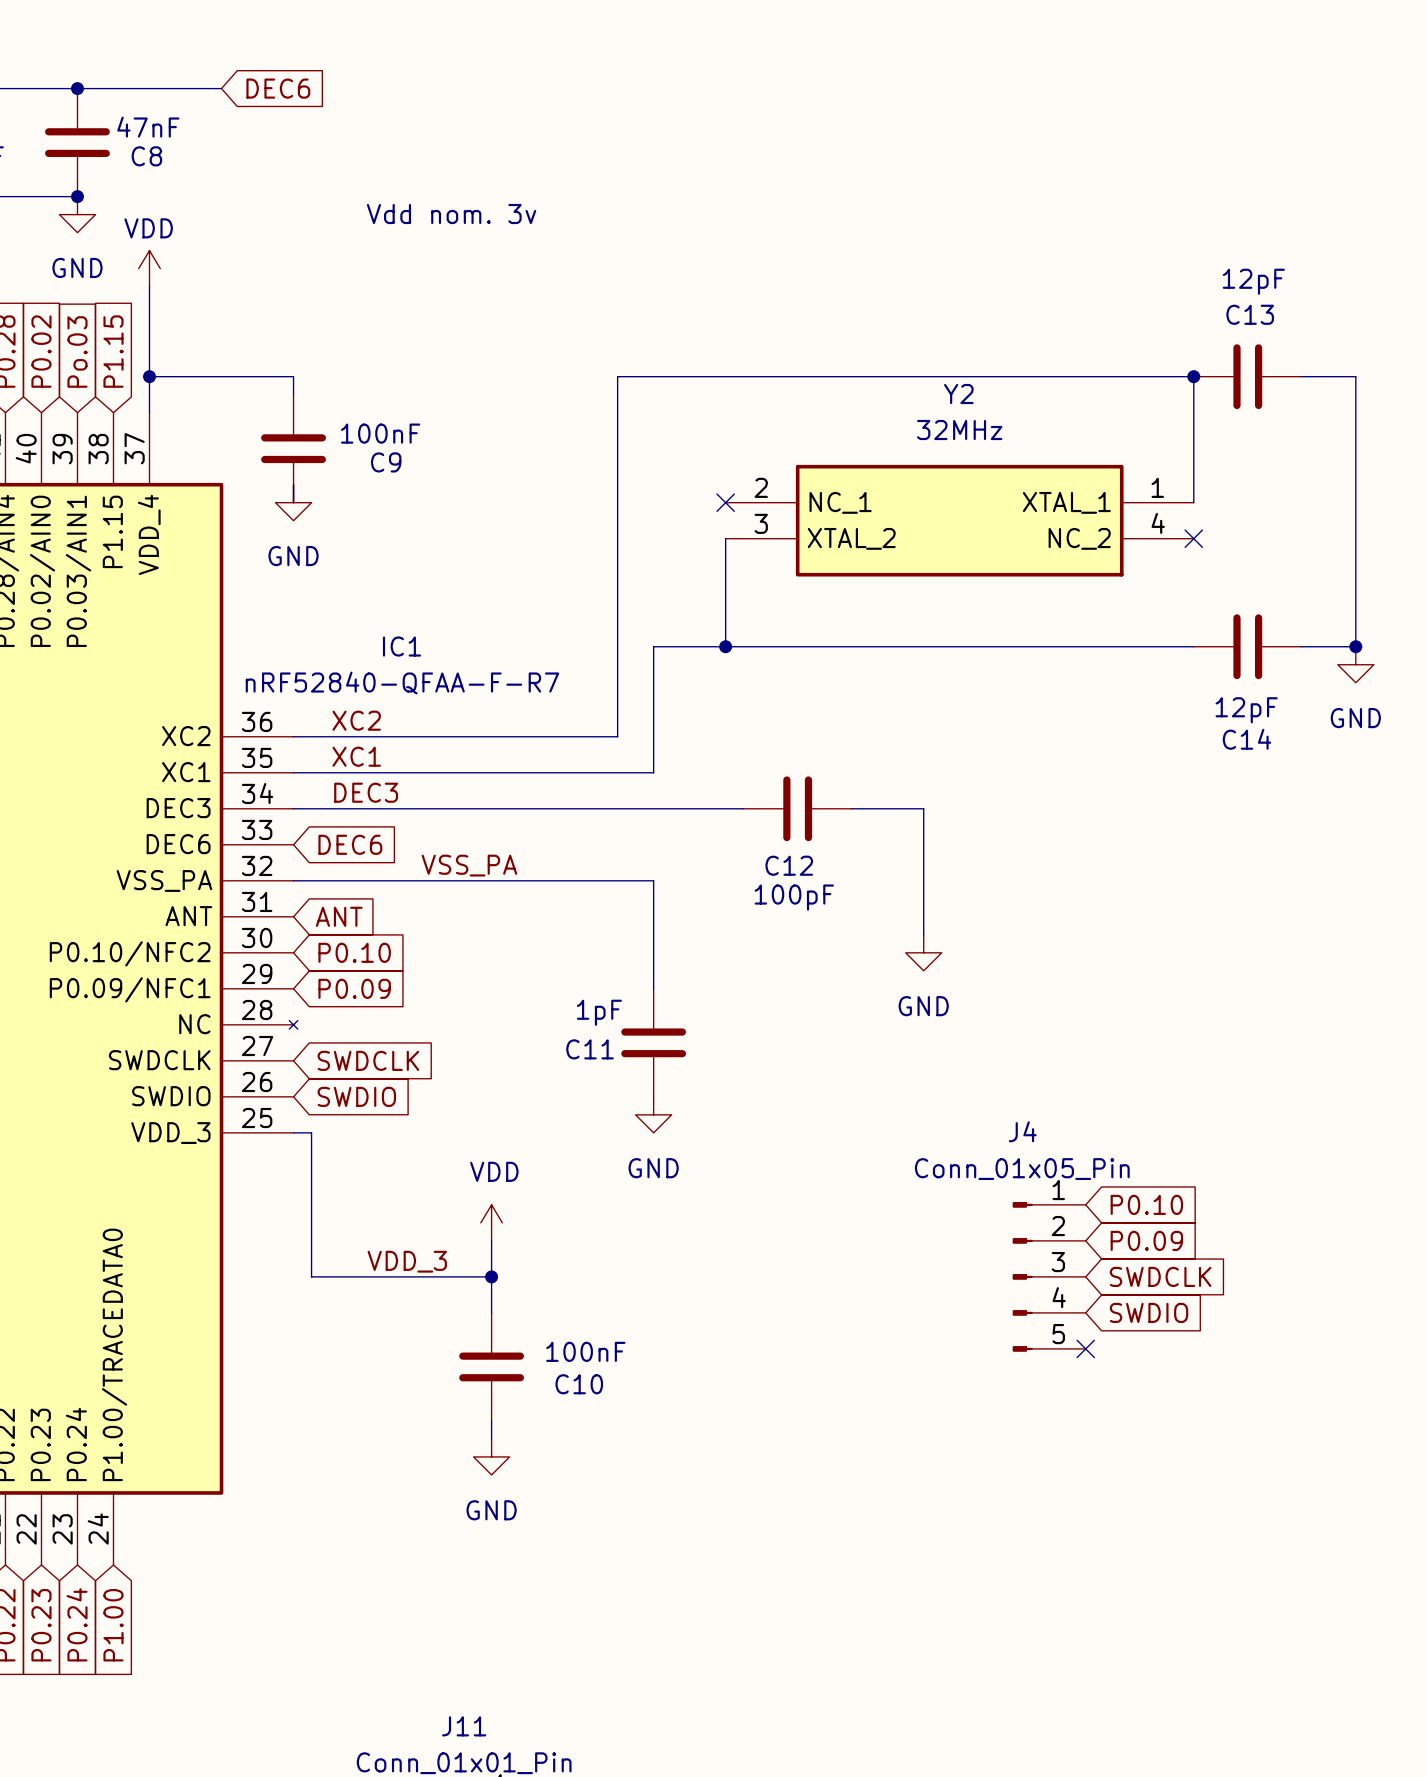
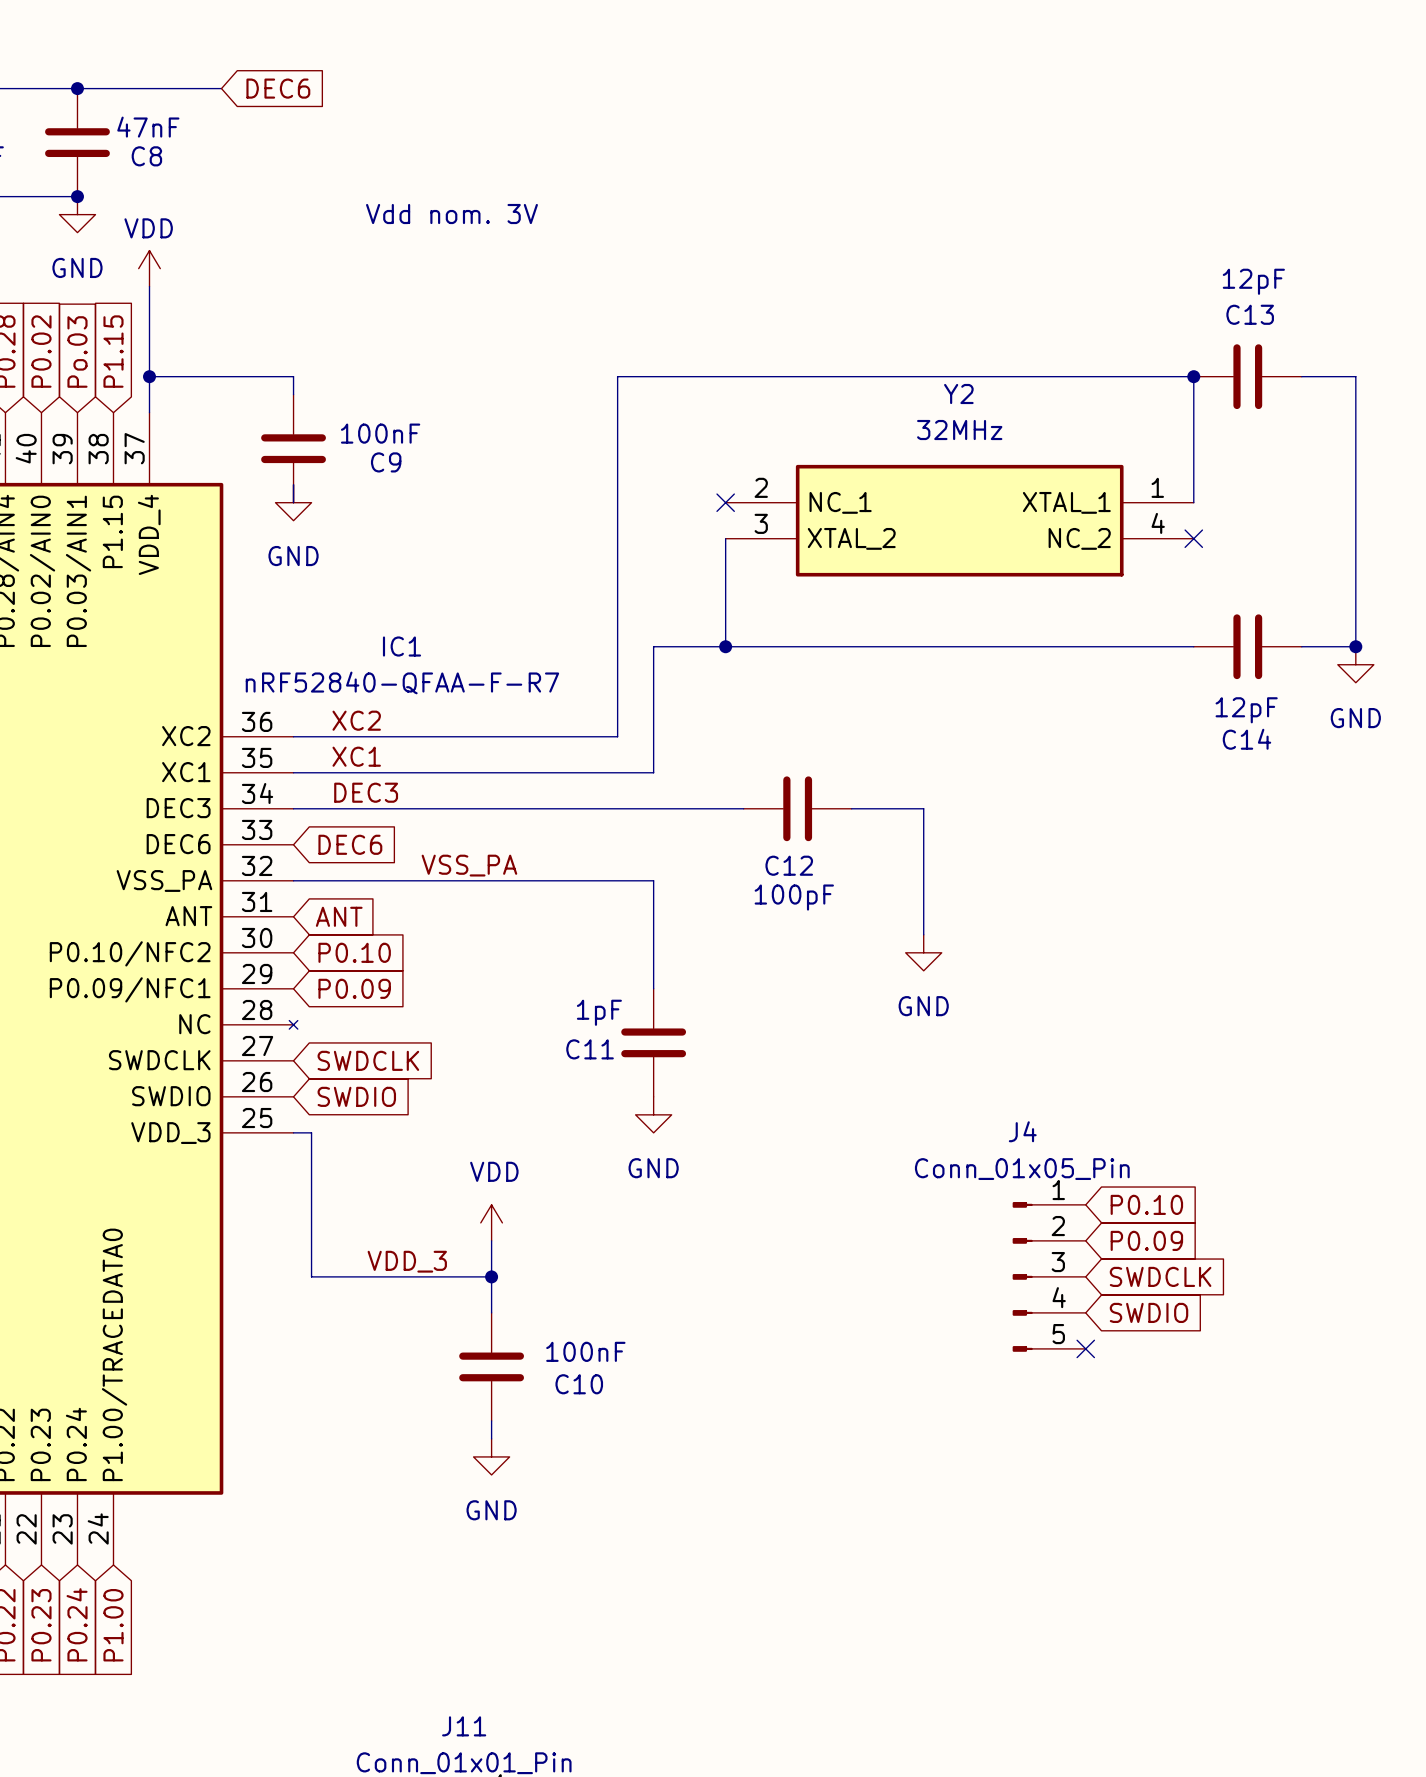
text: Vdd nom. 3v (451, 214) -> Vdd nom. 3V (451, 214)

